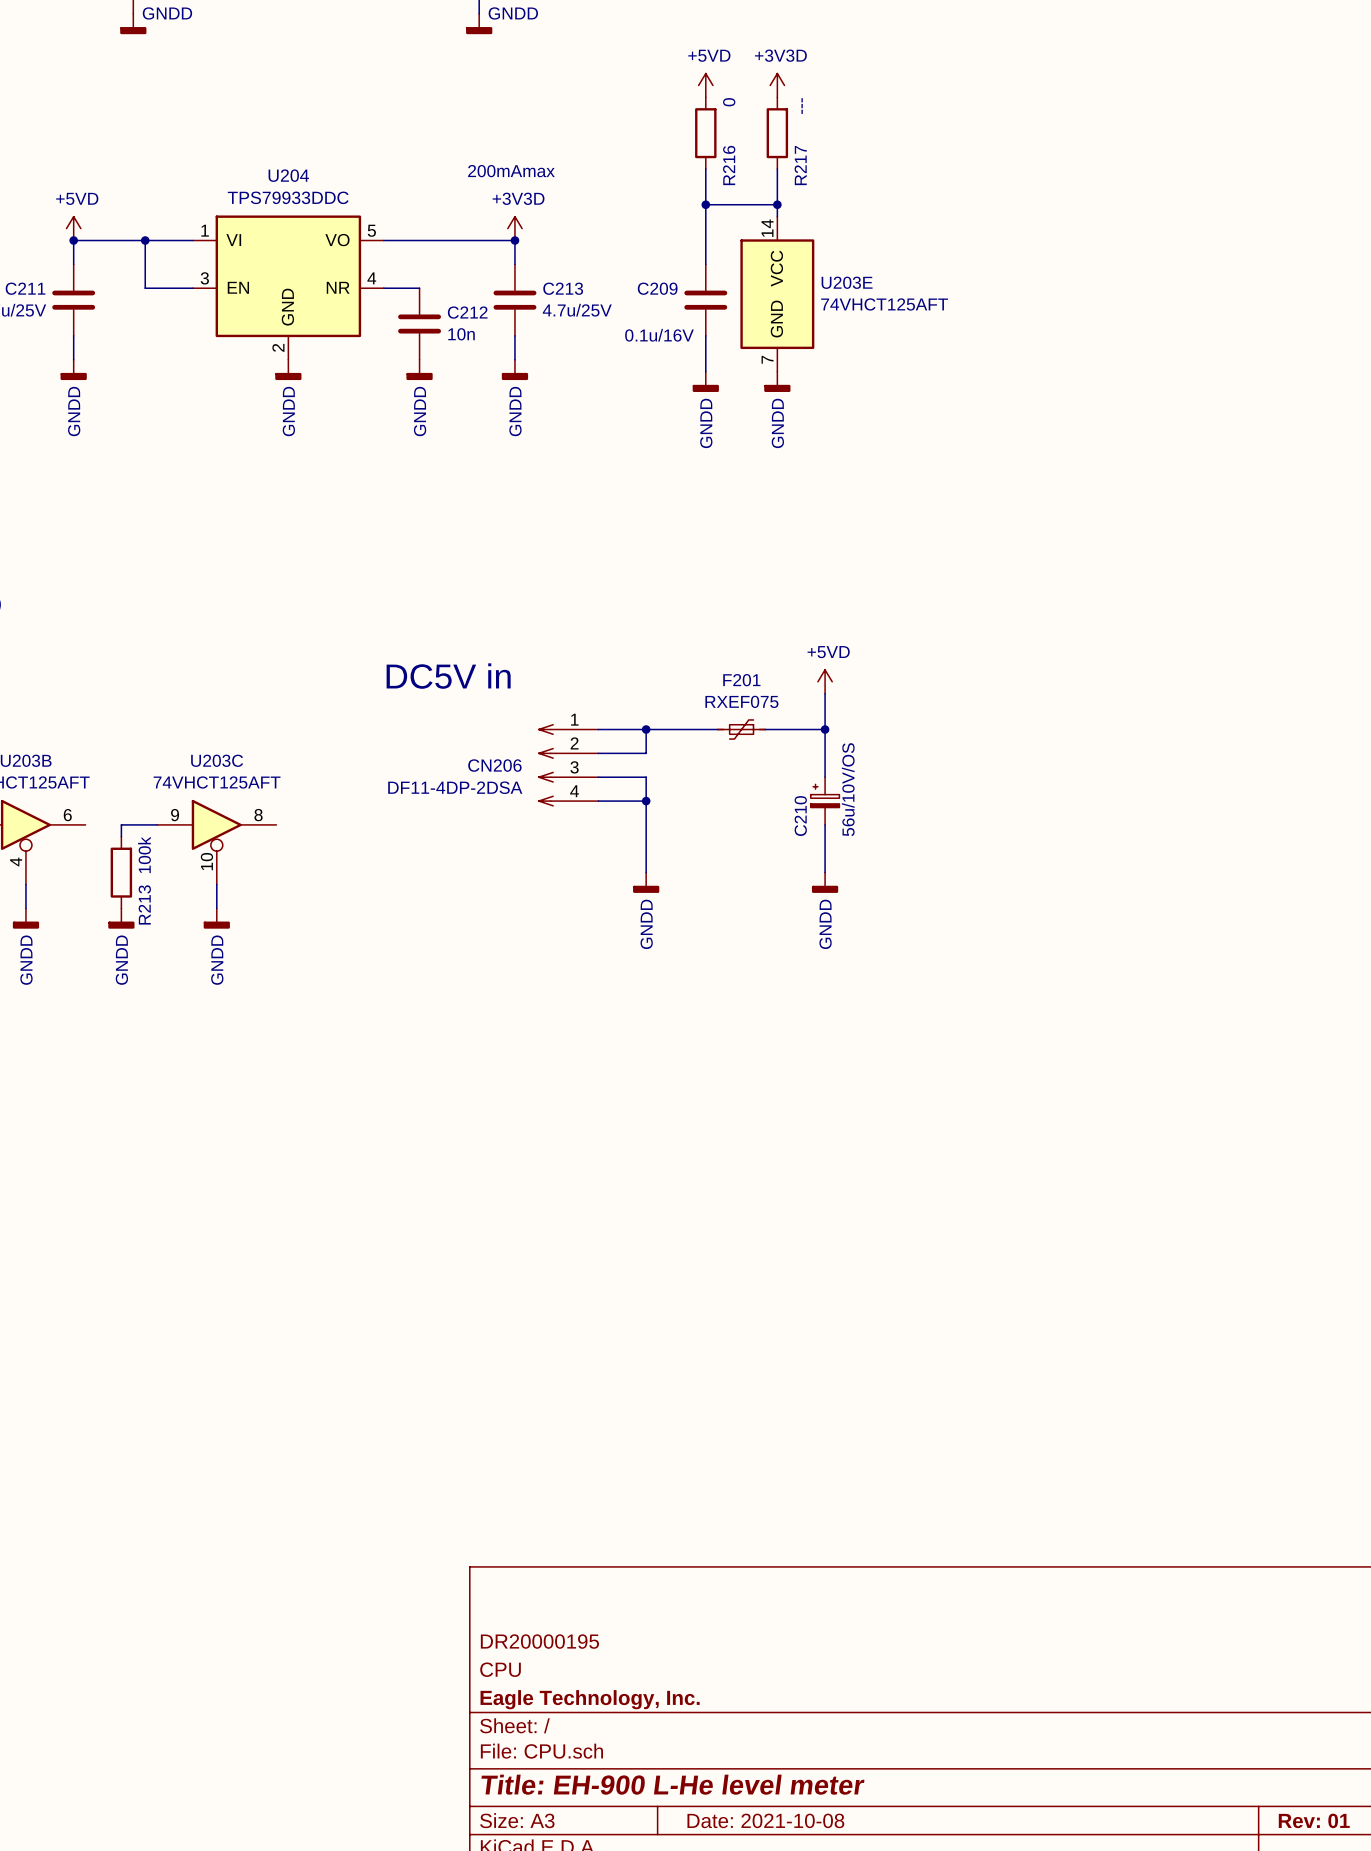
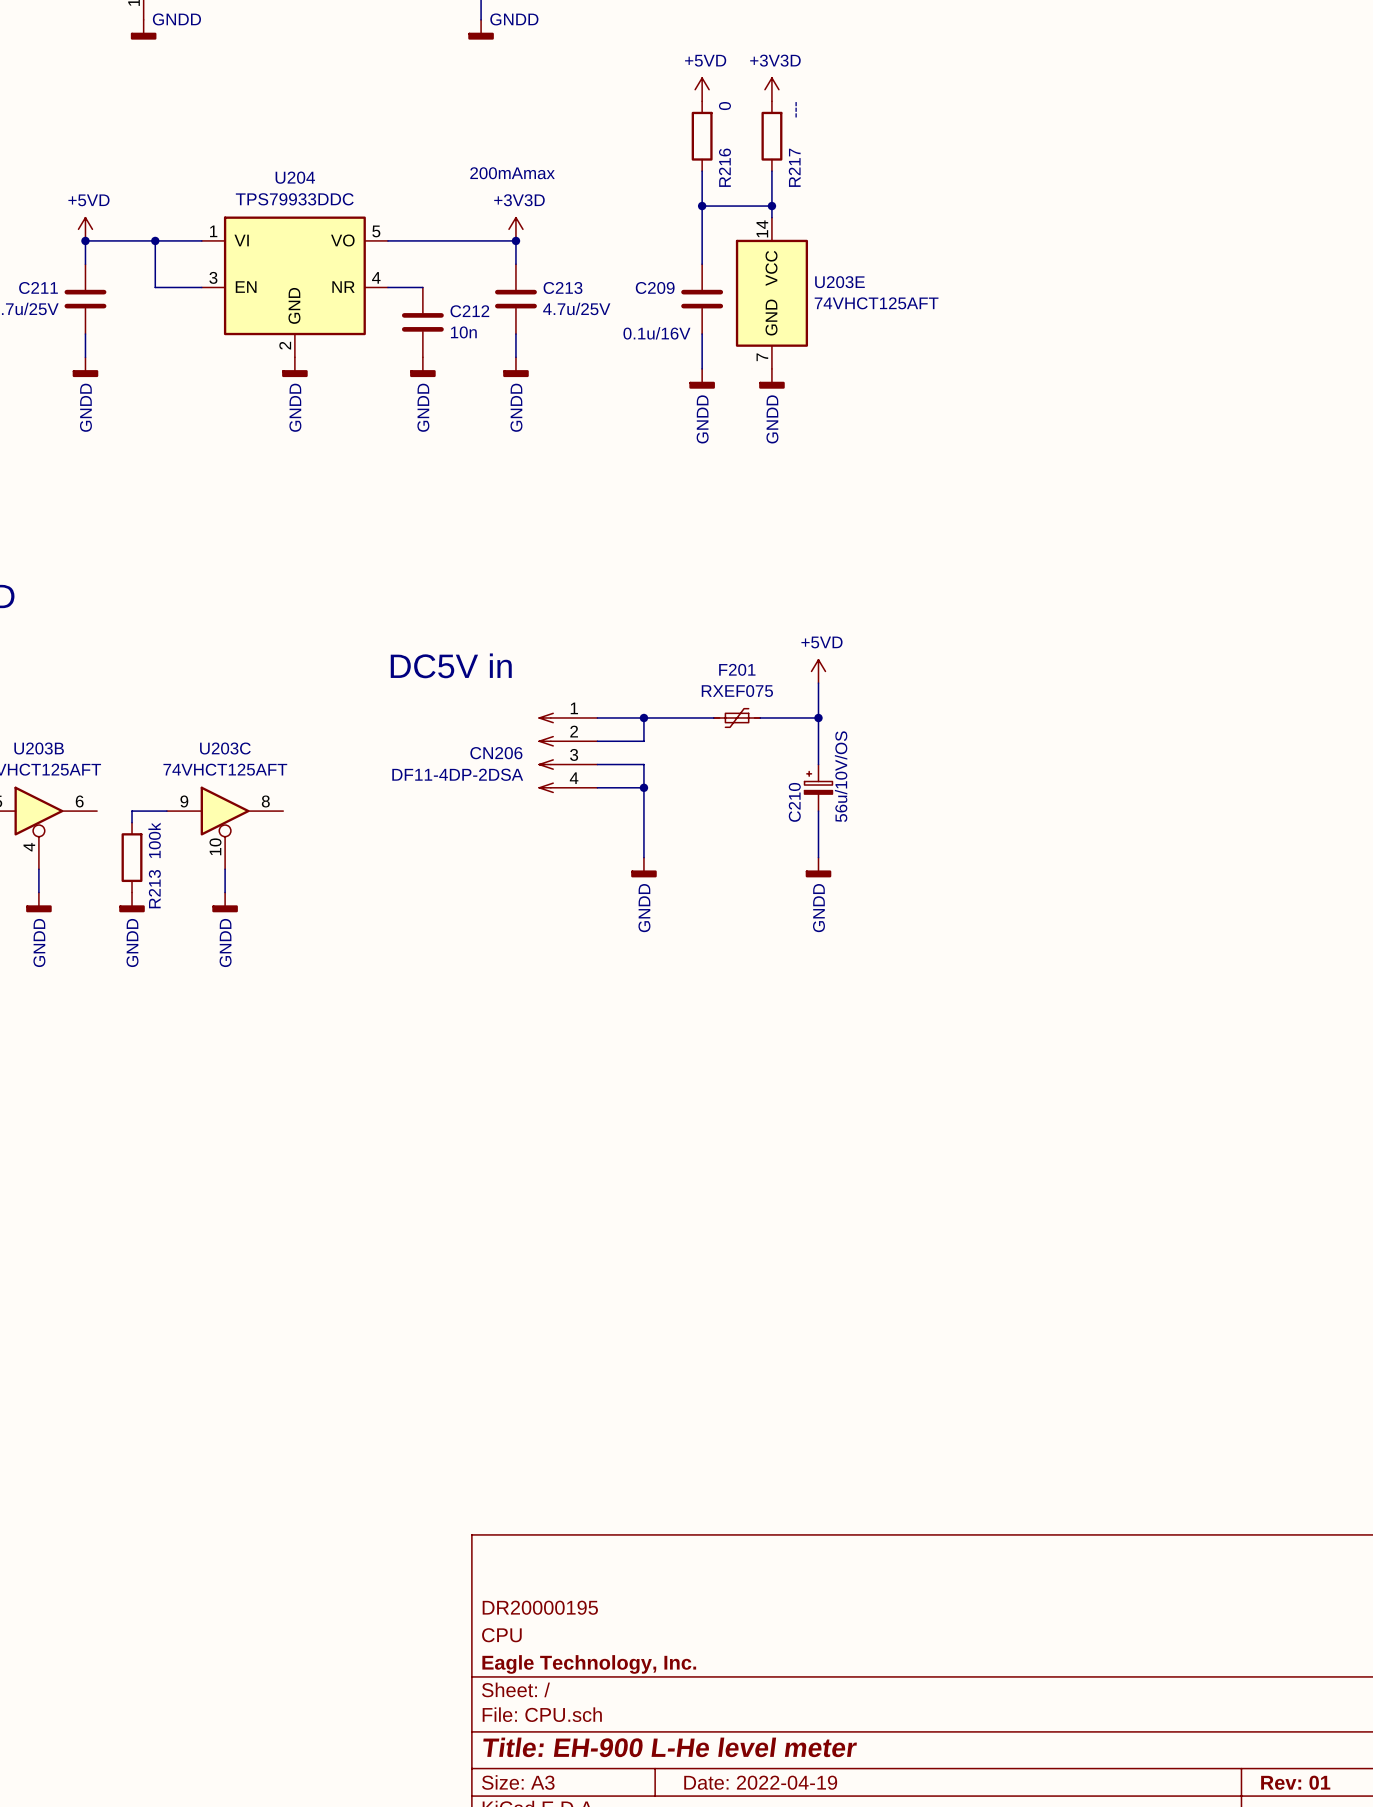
title block: Date: 2021-10-08 (765, 1820) -> Date: 2022-04-19 (760, 1782)

